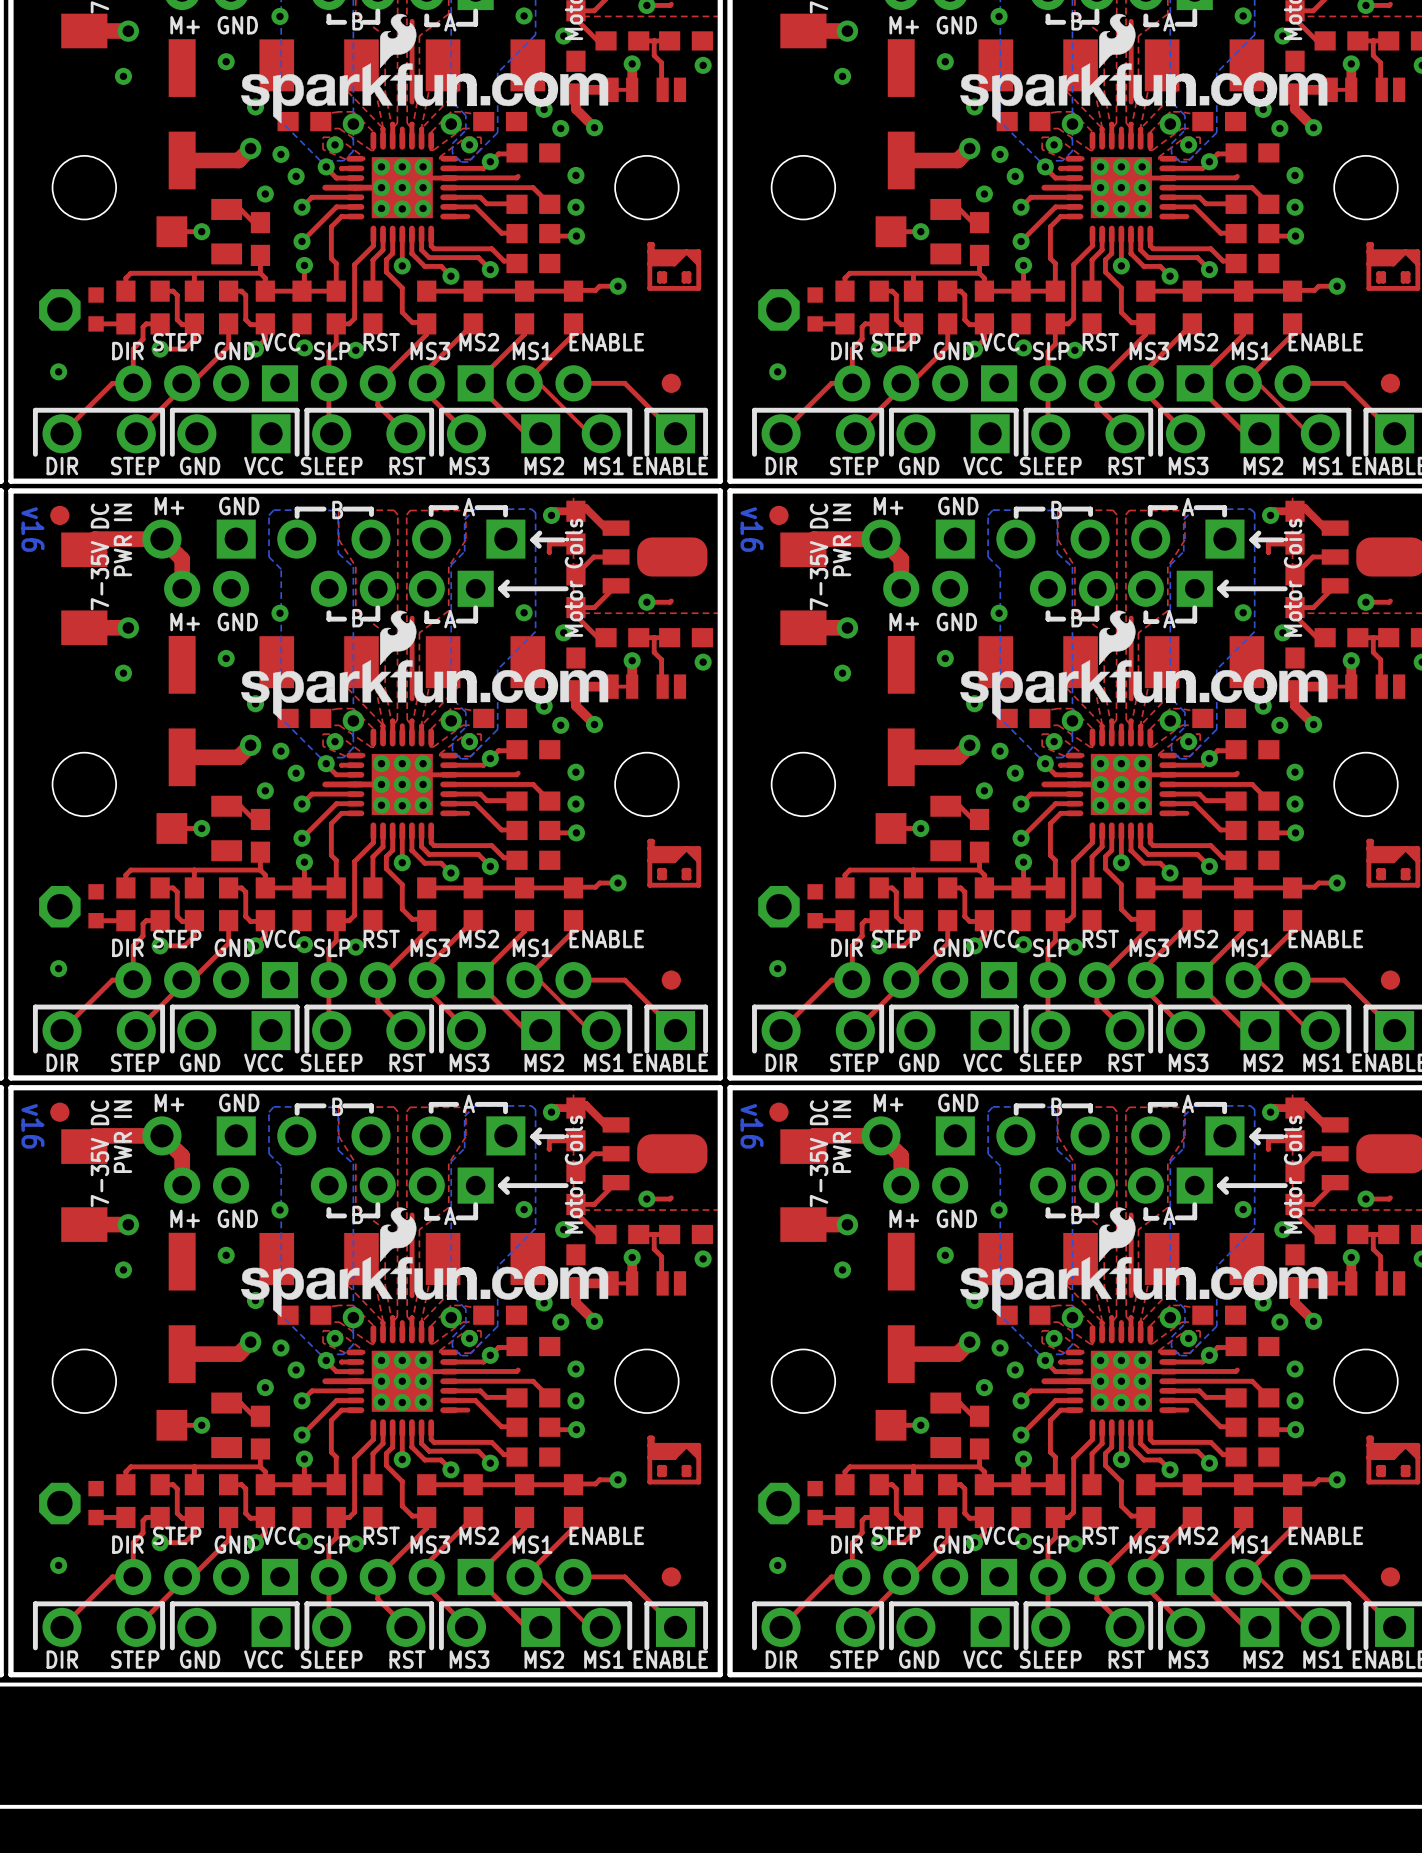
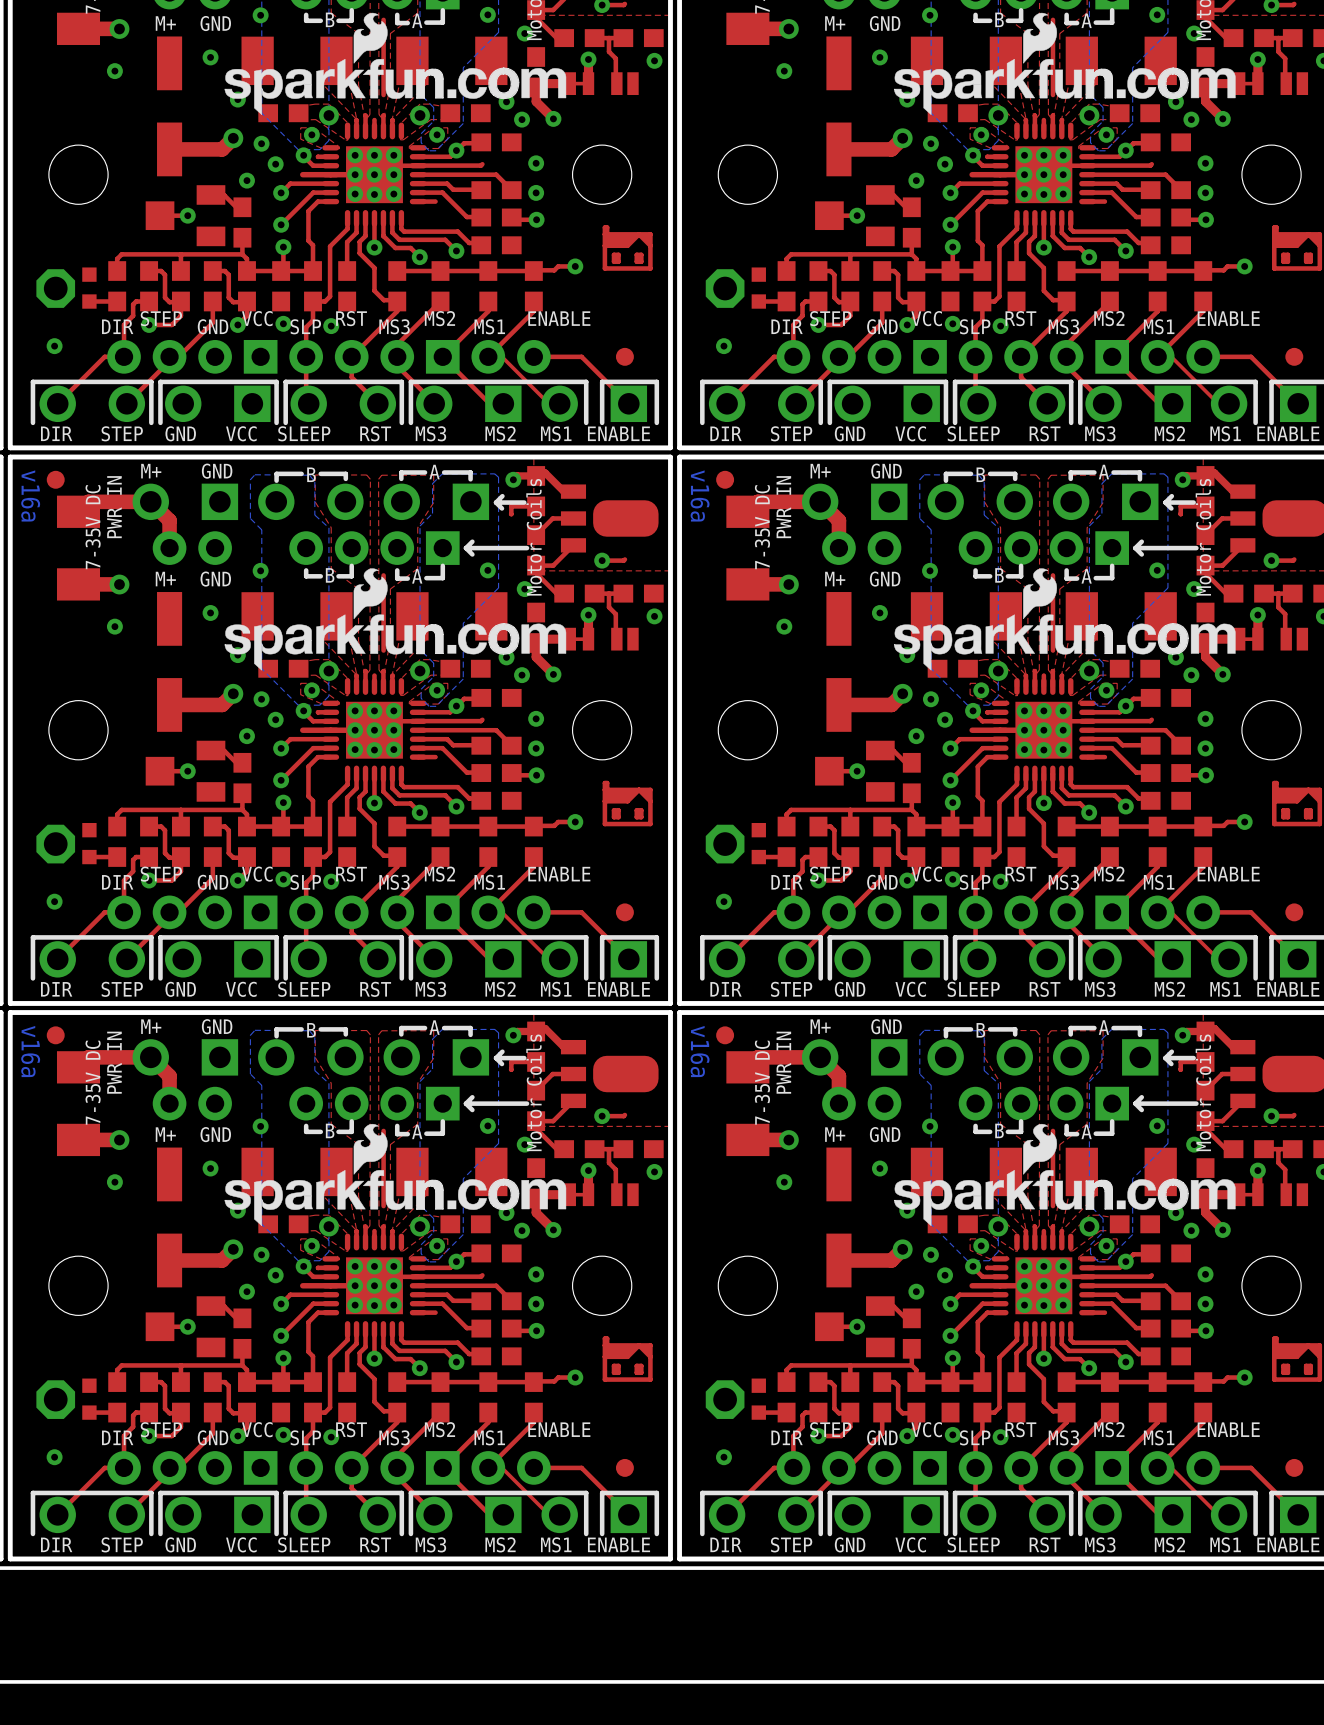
text: v16 (32, 529) -> v16a (30, 495)
text: v16 (752, 529) -> v16a (700, 495)
text: v16 (32, 1126) -> v16a (30, 1051)
text: v16 (752, 1126) -> v16a (700, 1051)

